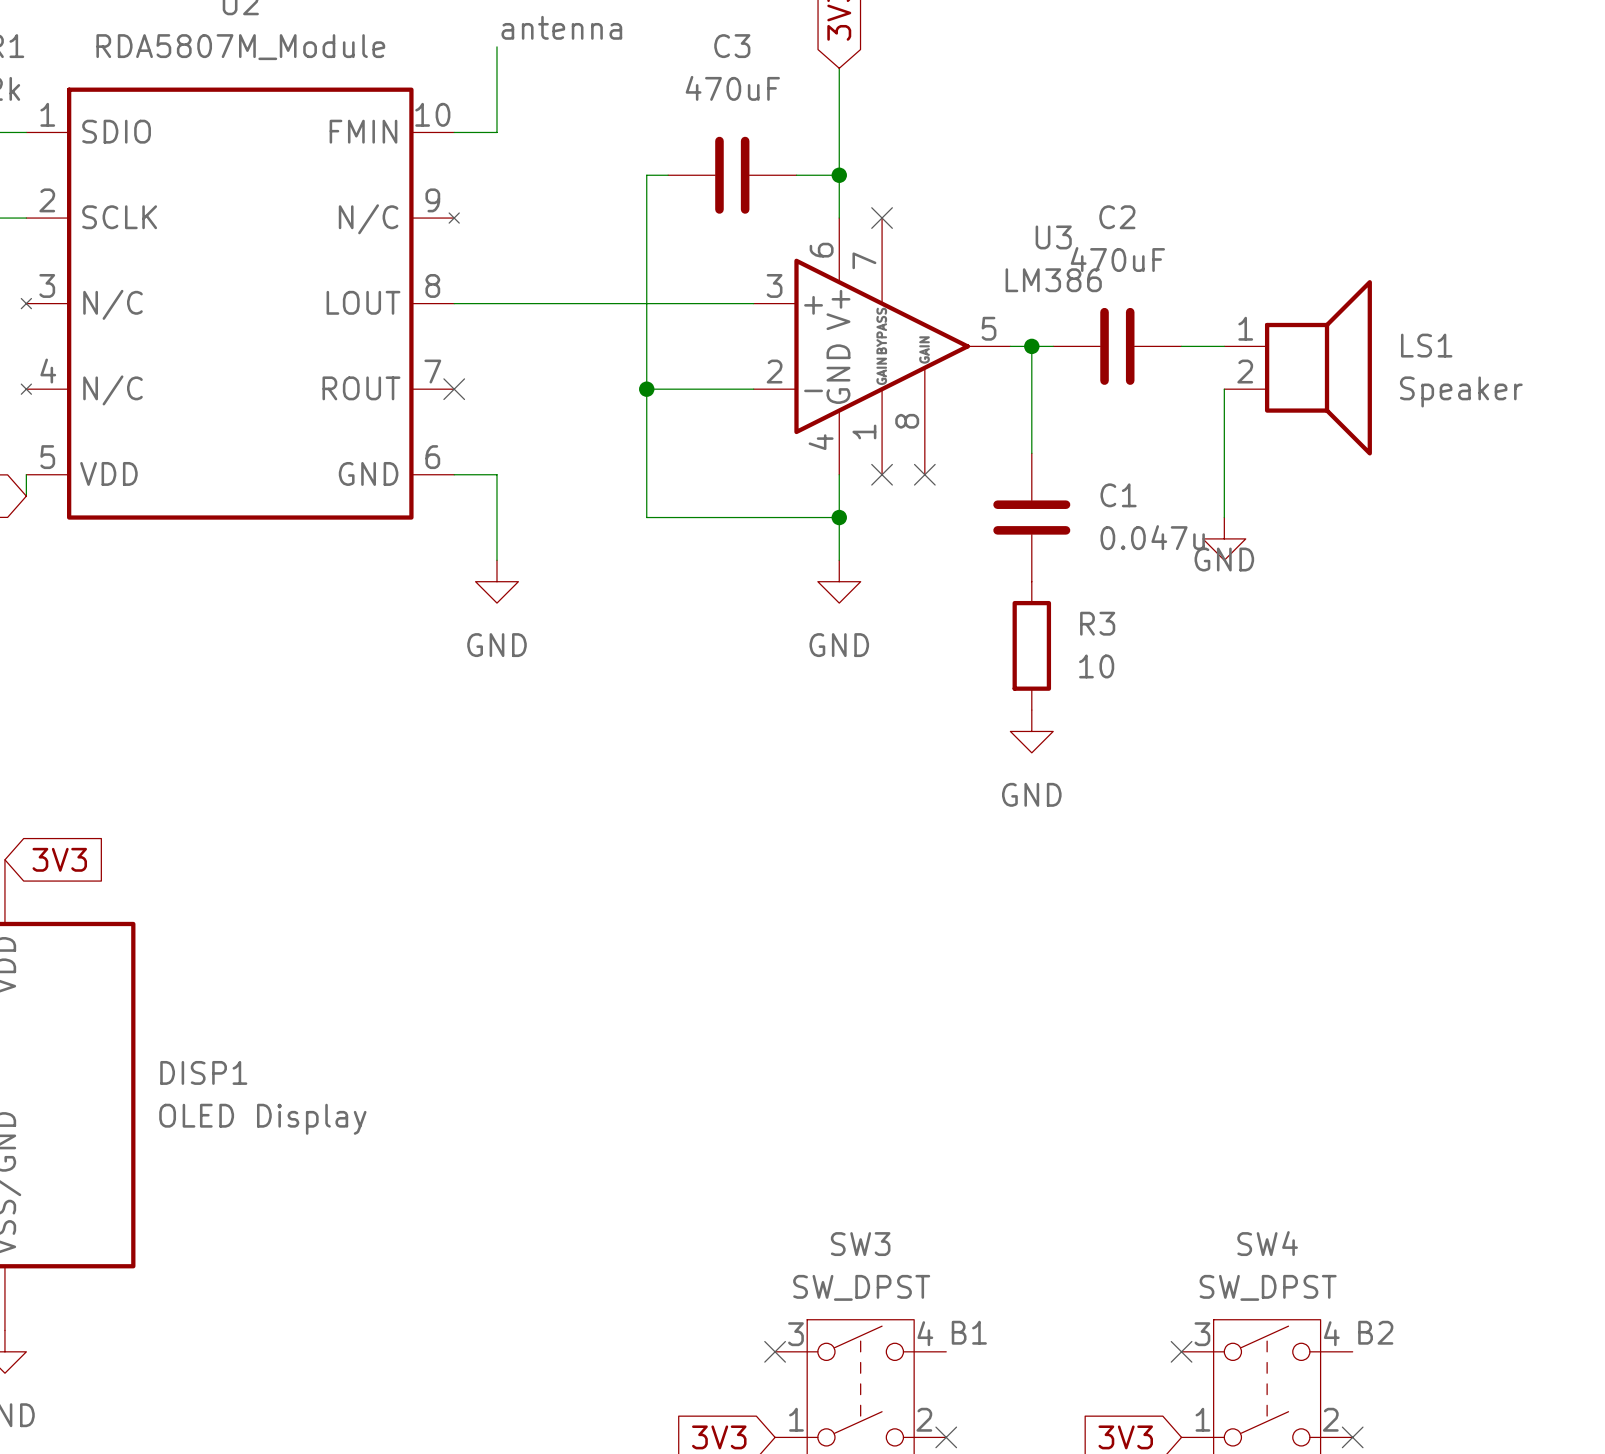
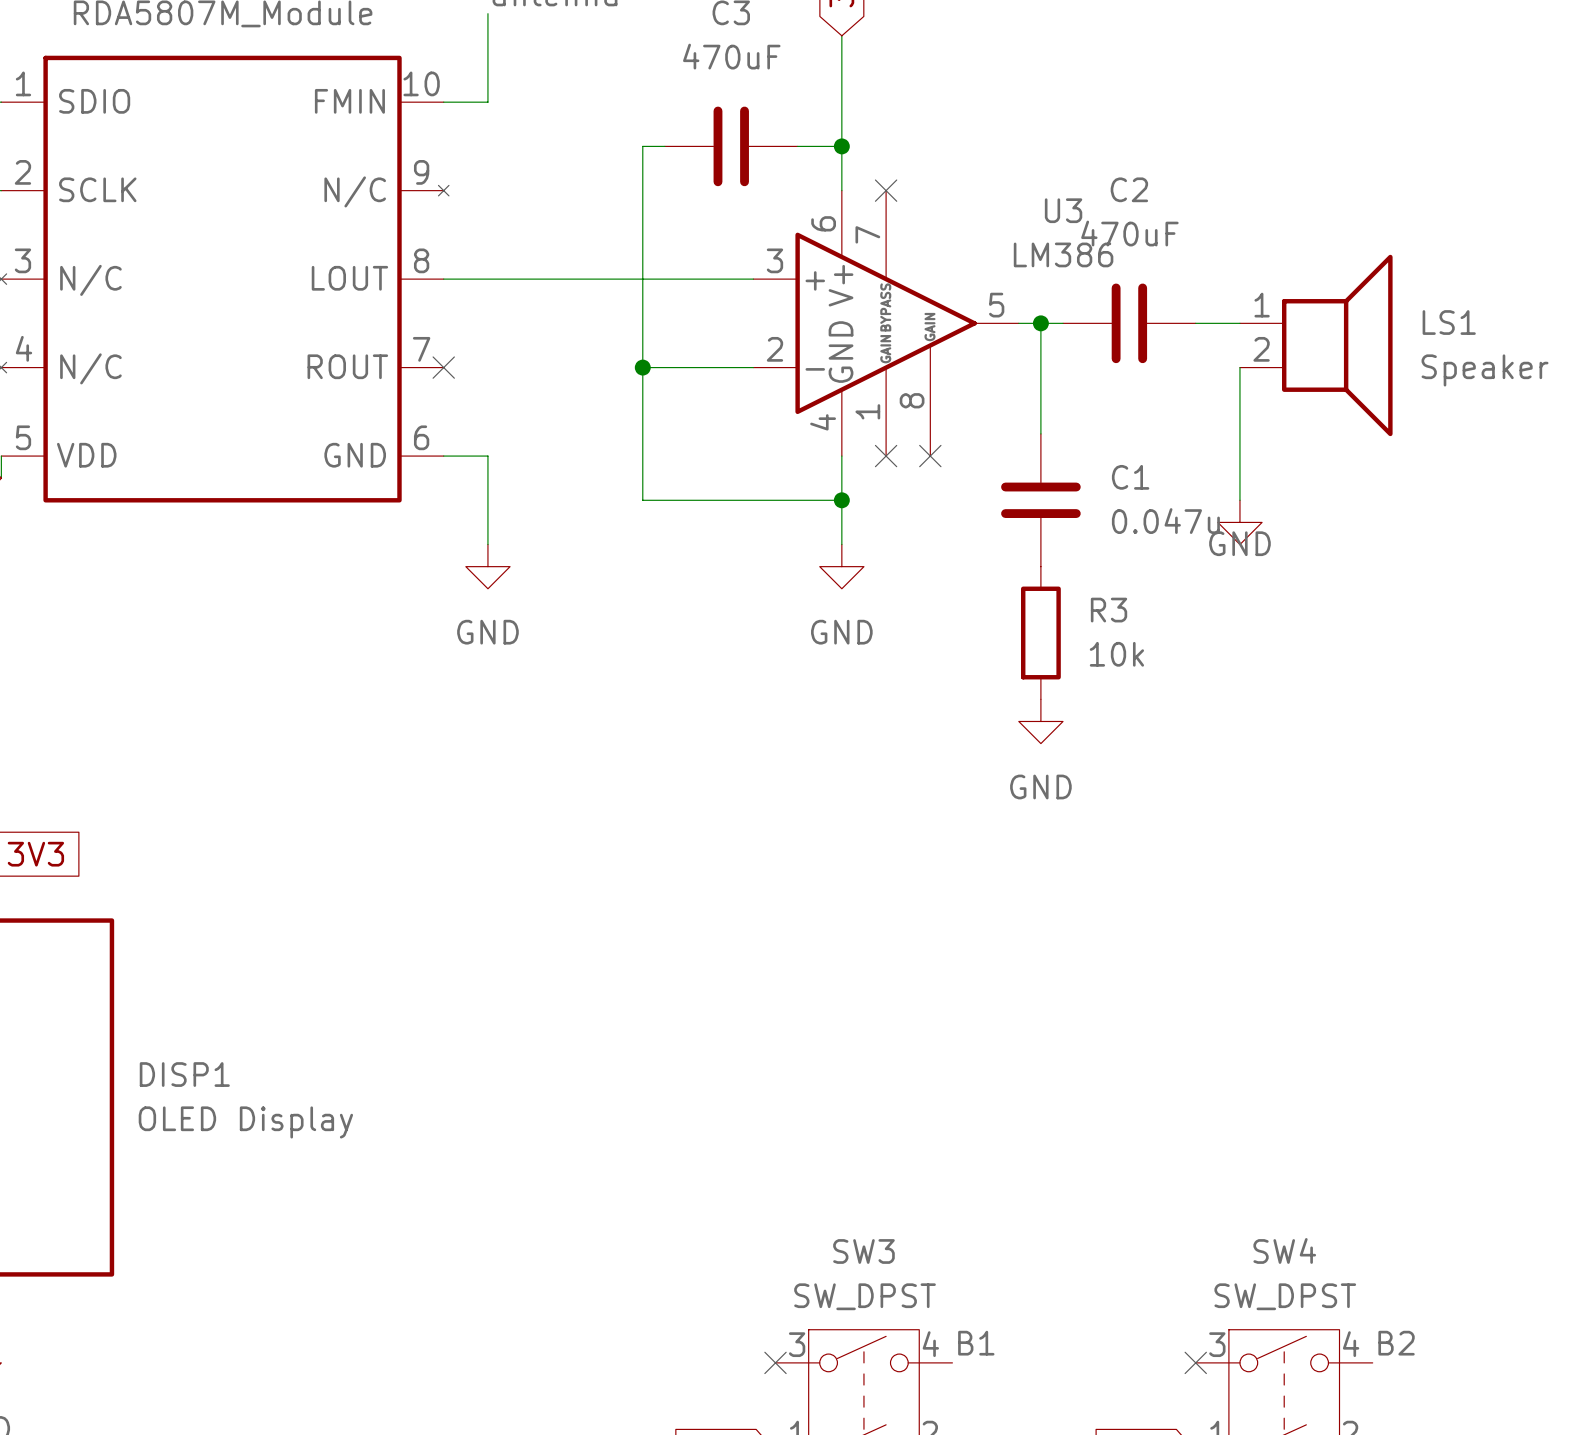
R3 value: 10 (1096, 666) -> 10k (1116, 654)

